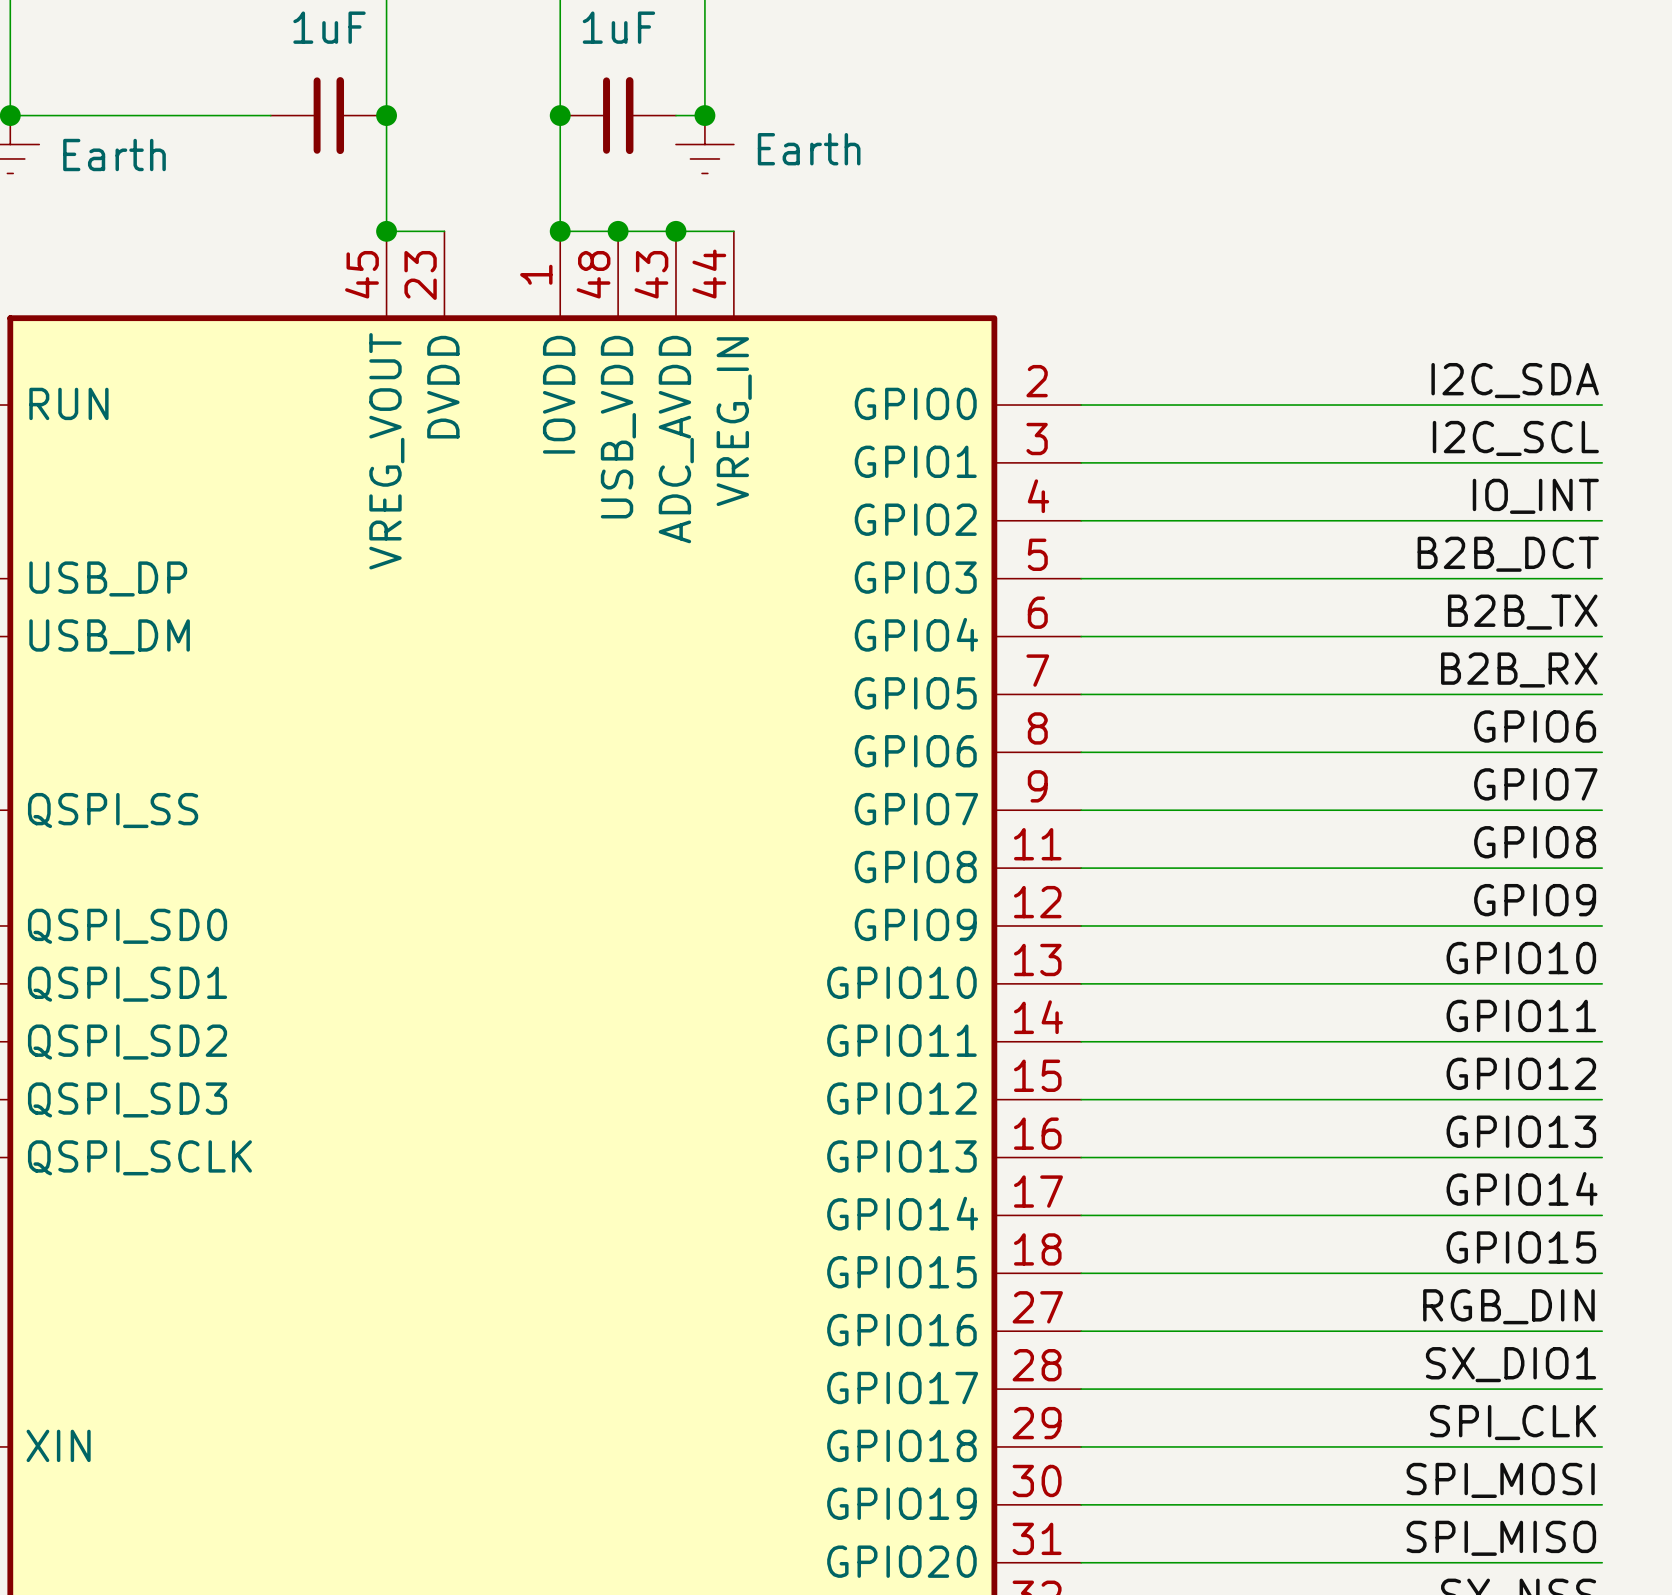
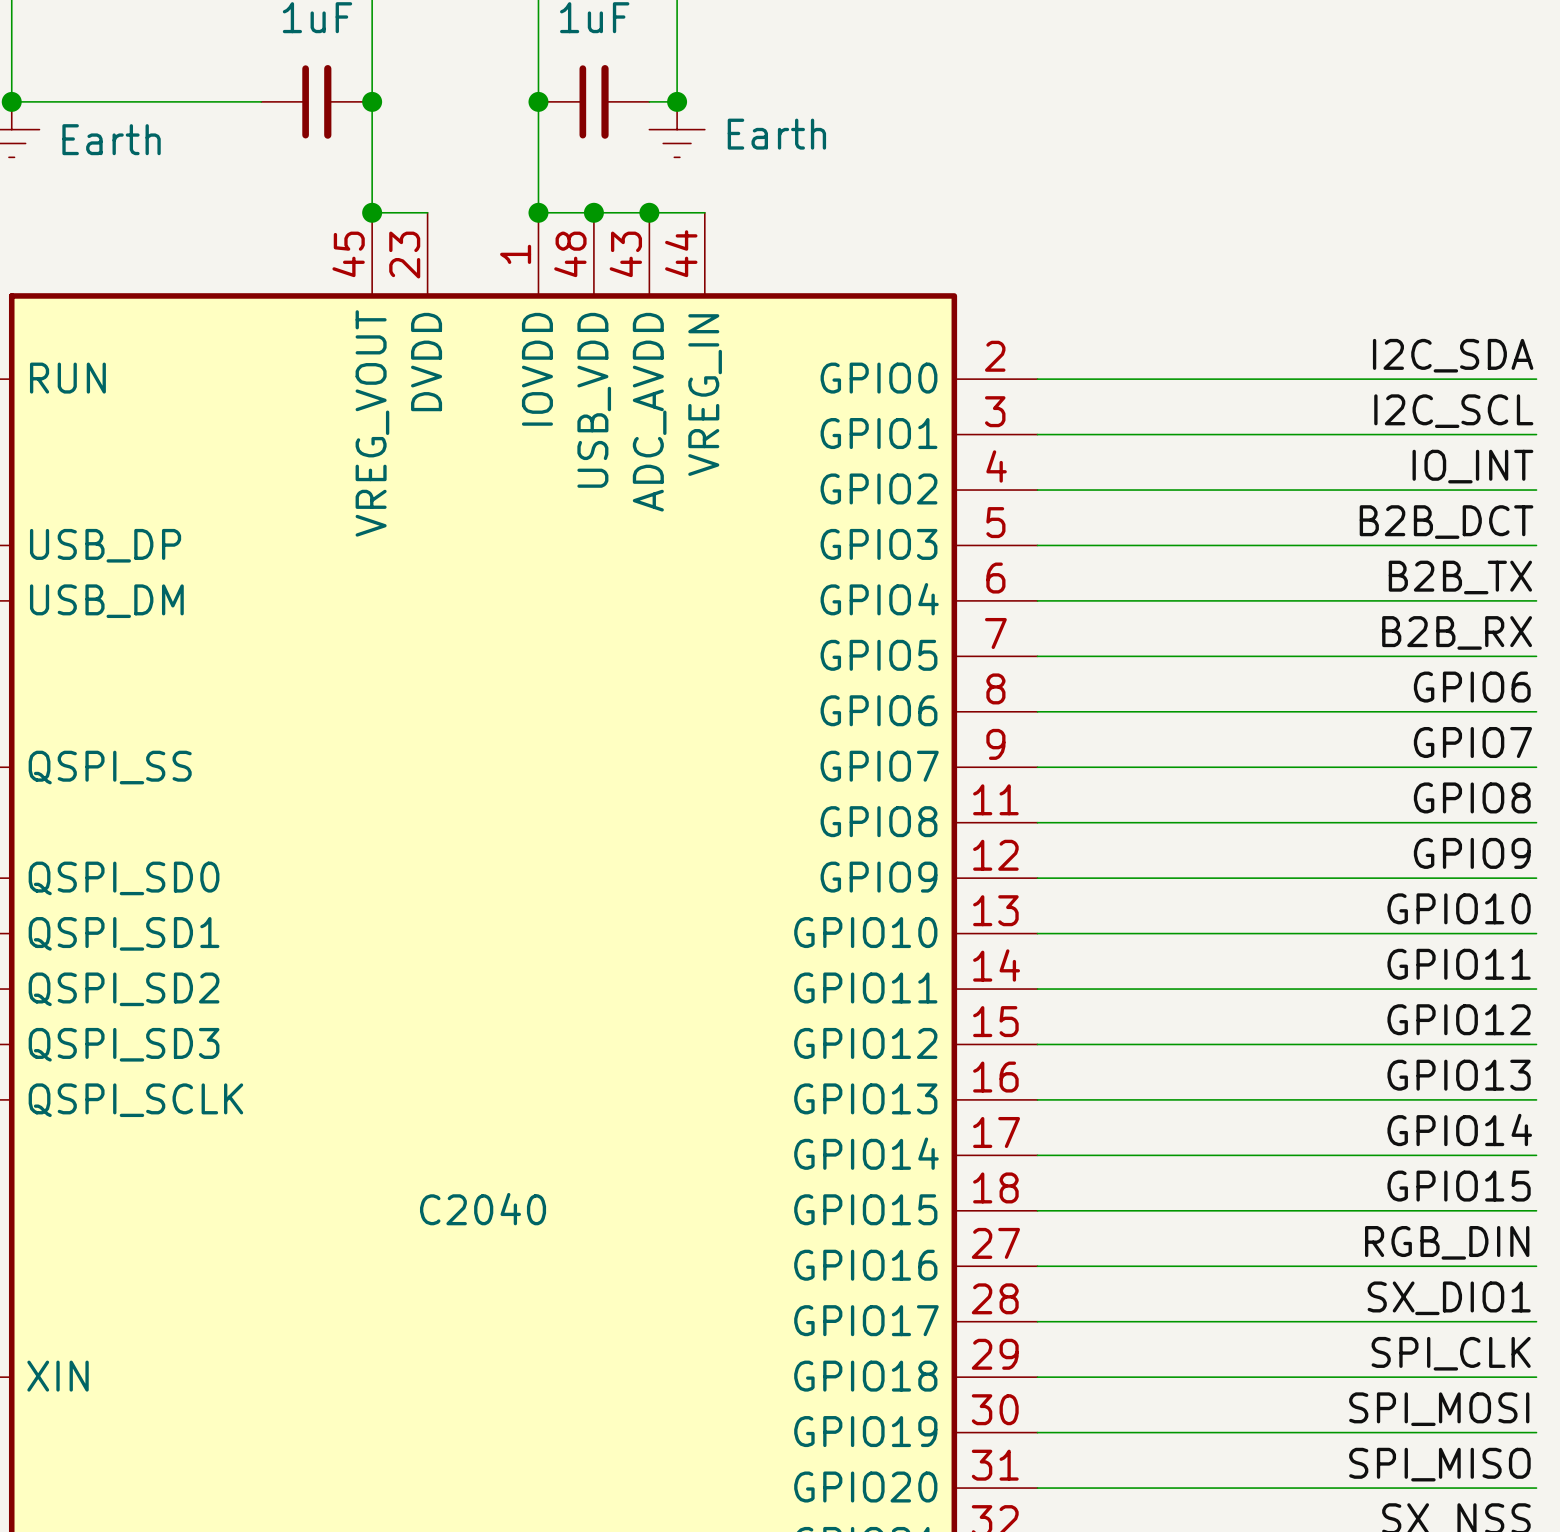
part text: none -> C2040 (483, 1209)

